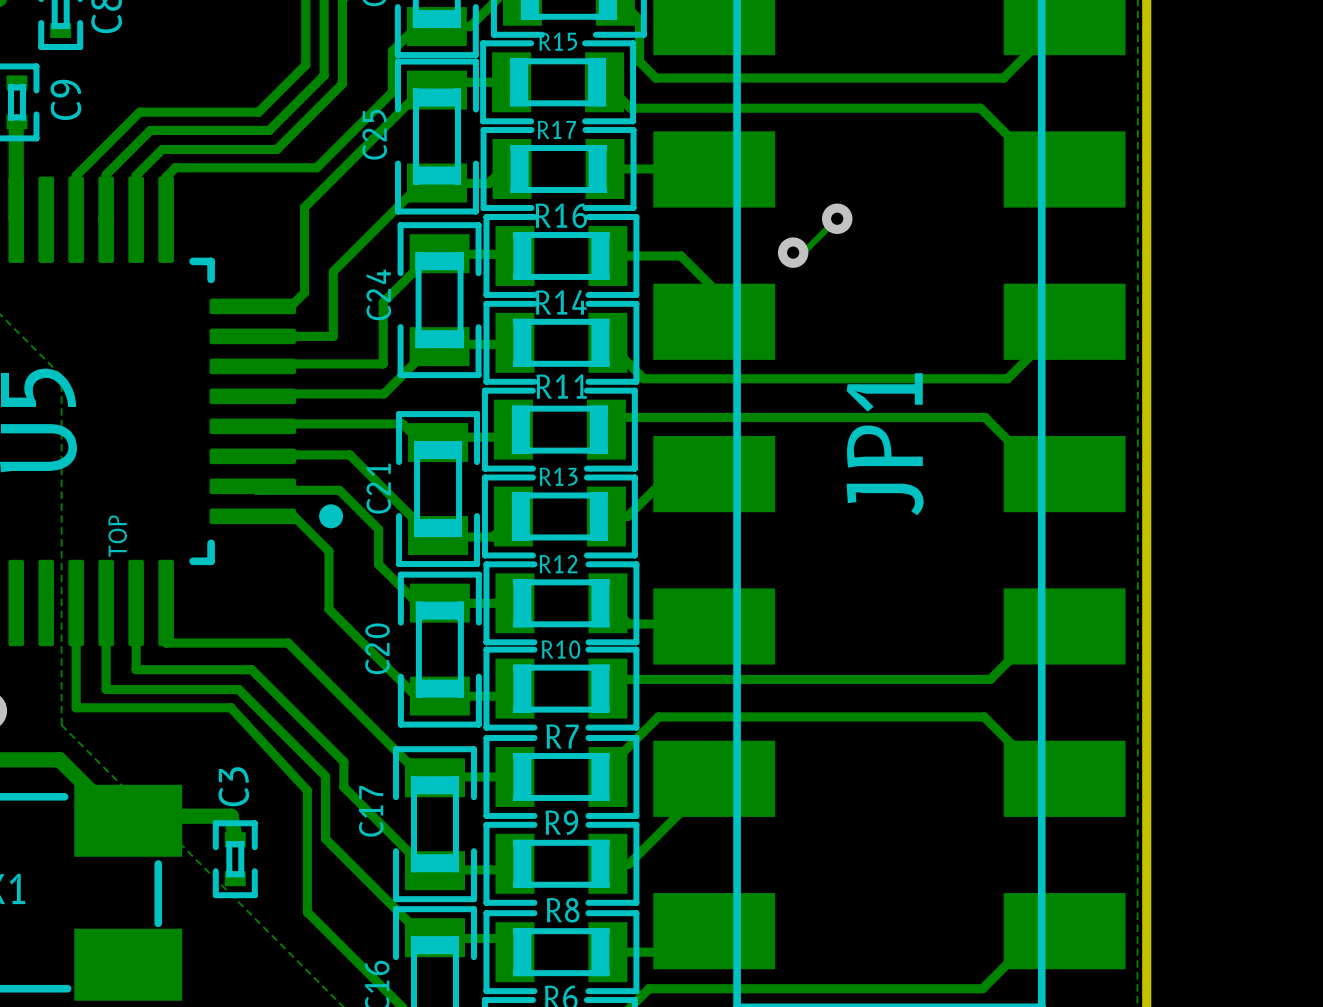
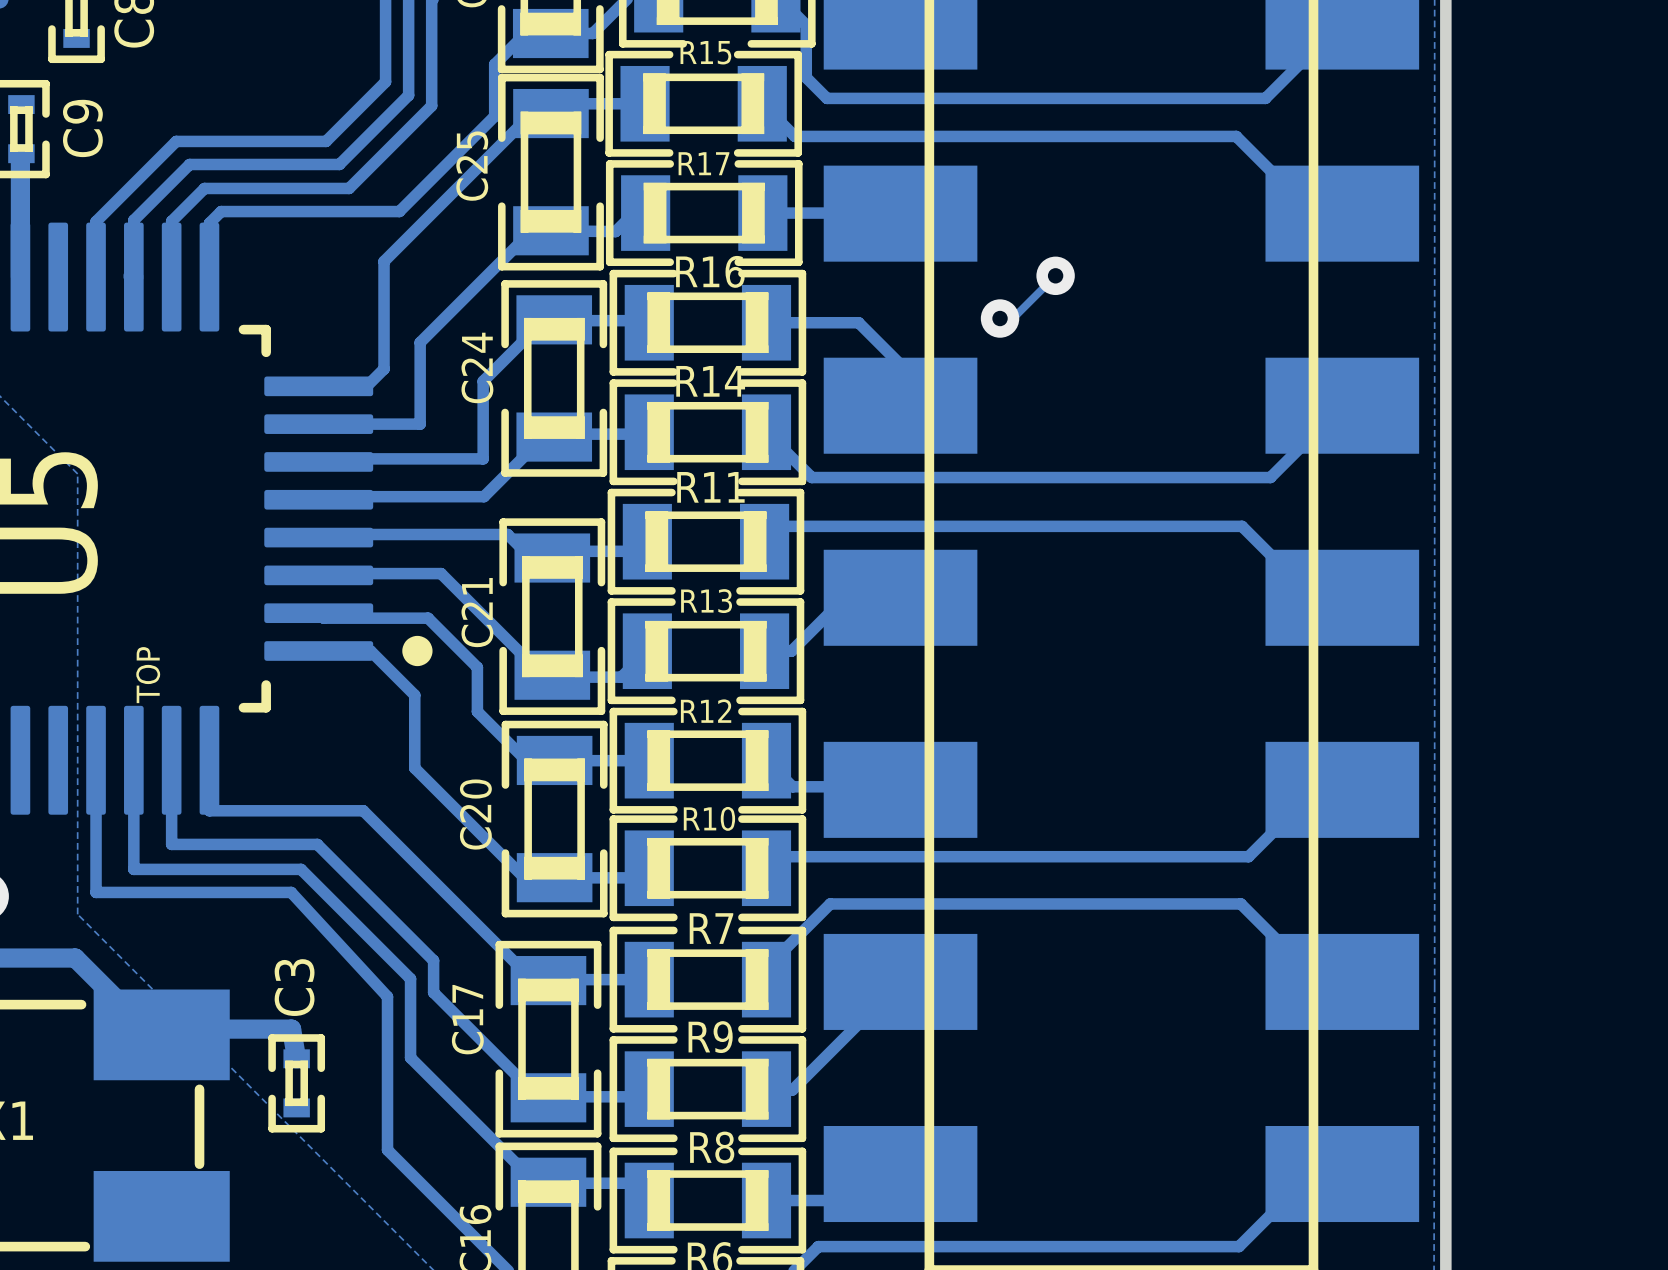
JP1 name: JP1 (885, 444) -> none

